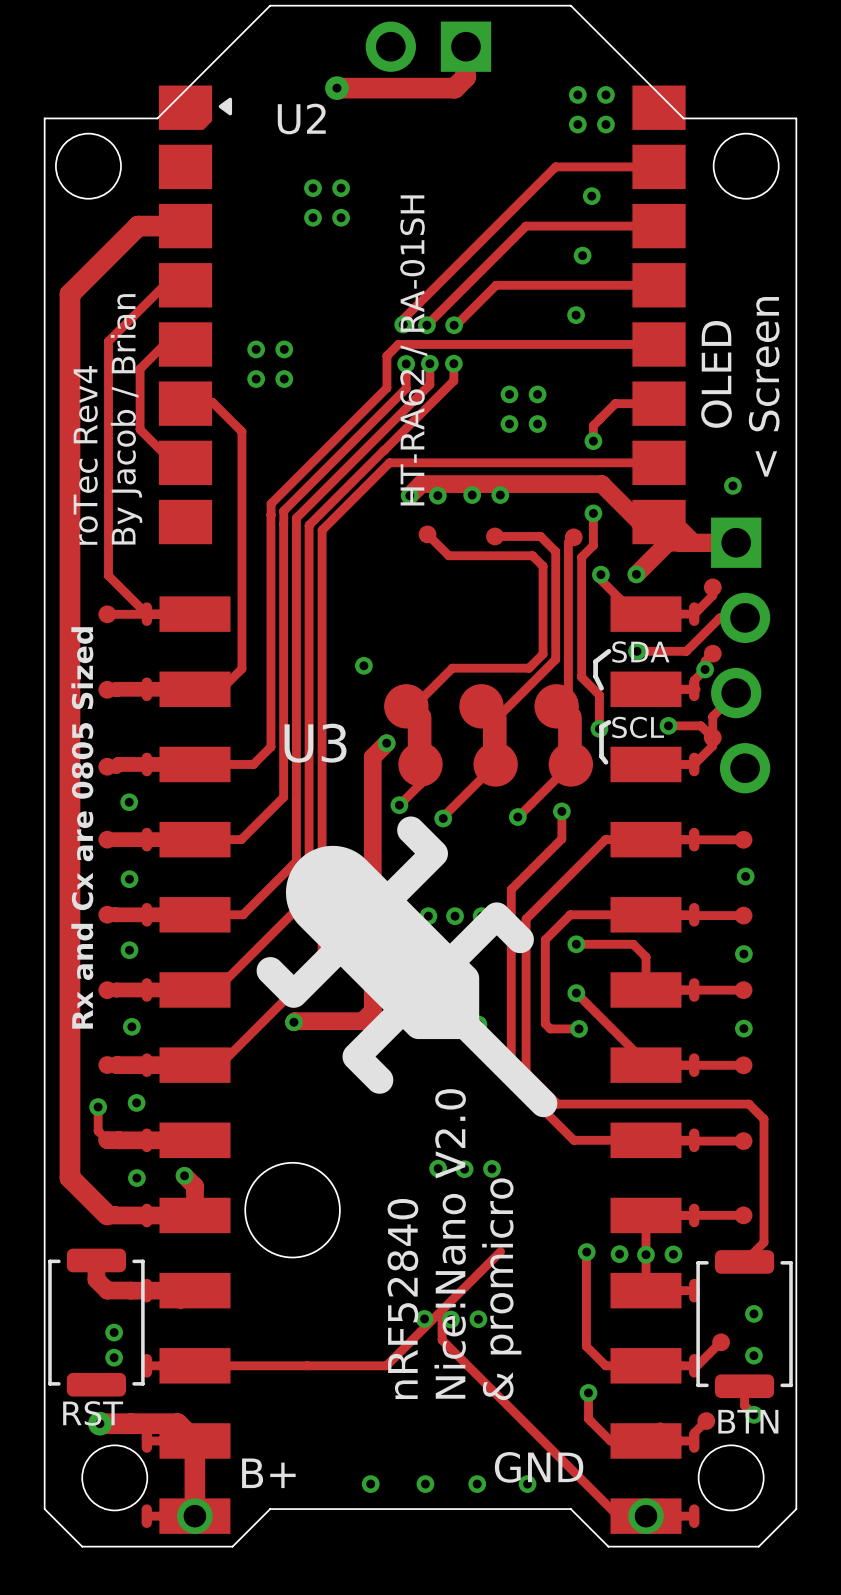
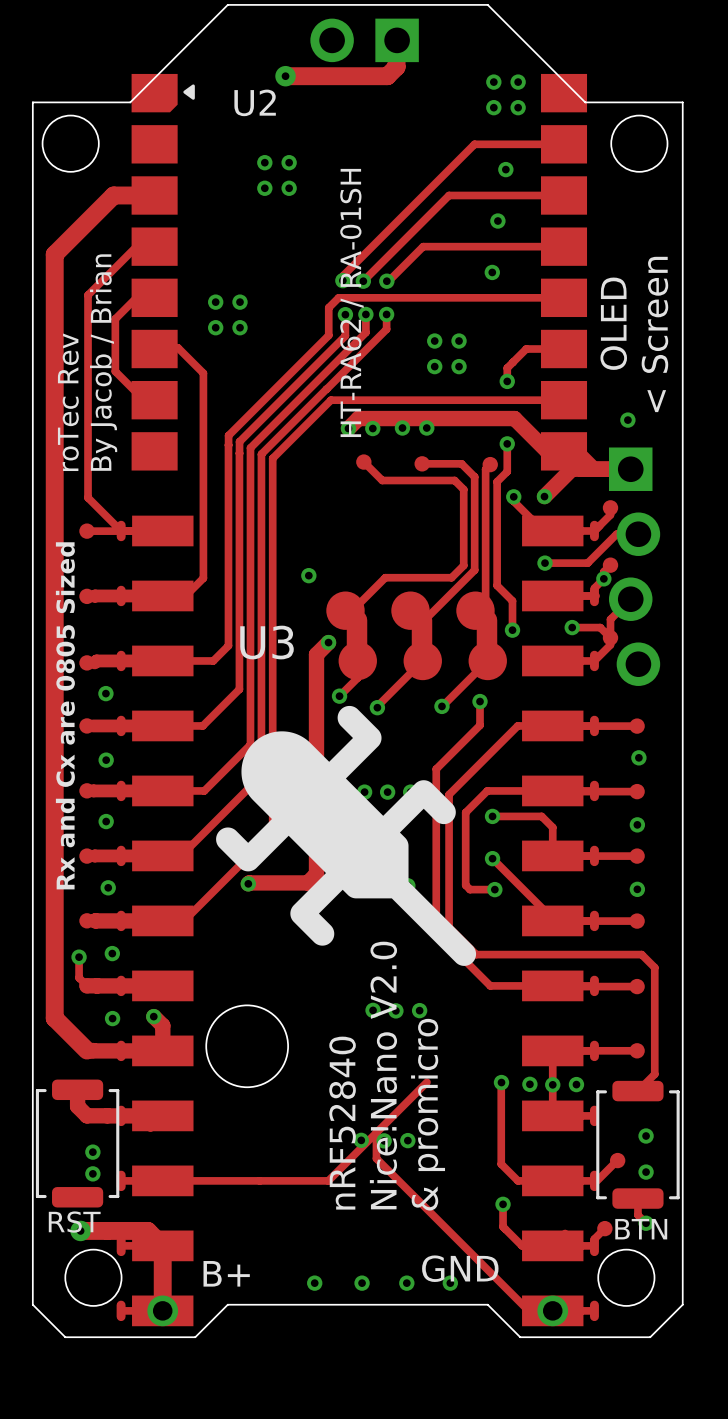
text: roTec Rev4 (85, 455) -> roTec Rev (68, 402)
line: (608, 651) (595, 661) (595, 676) (601, 688) -> none
text: SDA (640, 652) -> none
line: (608, 722) (601, 726) (601, 756) (605, 762) -> none
text: SCL (638, 727) -> none

